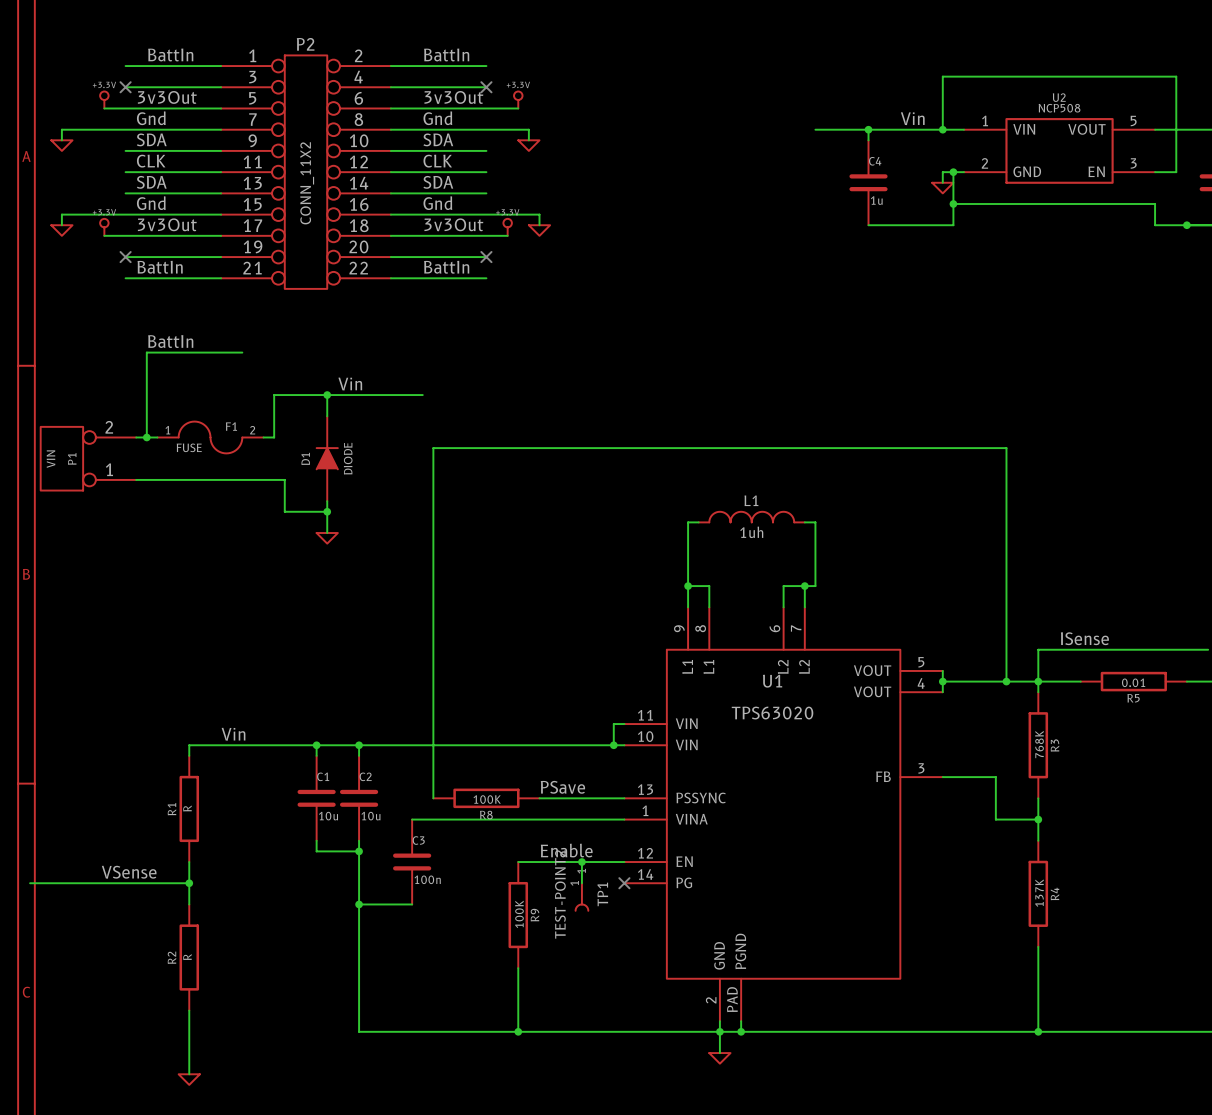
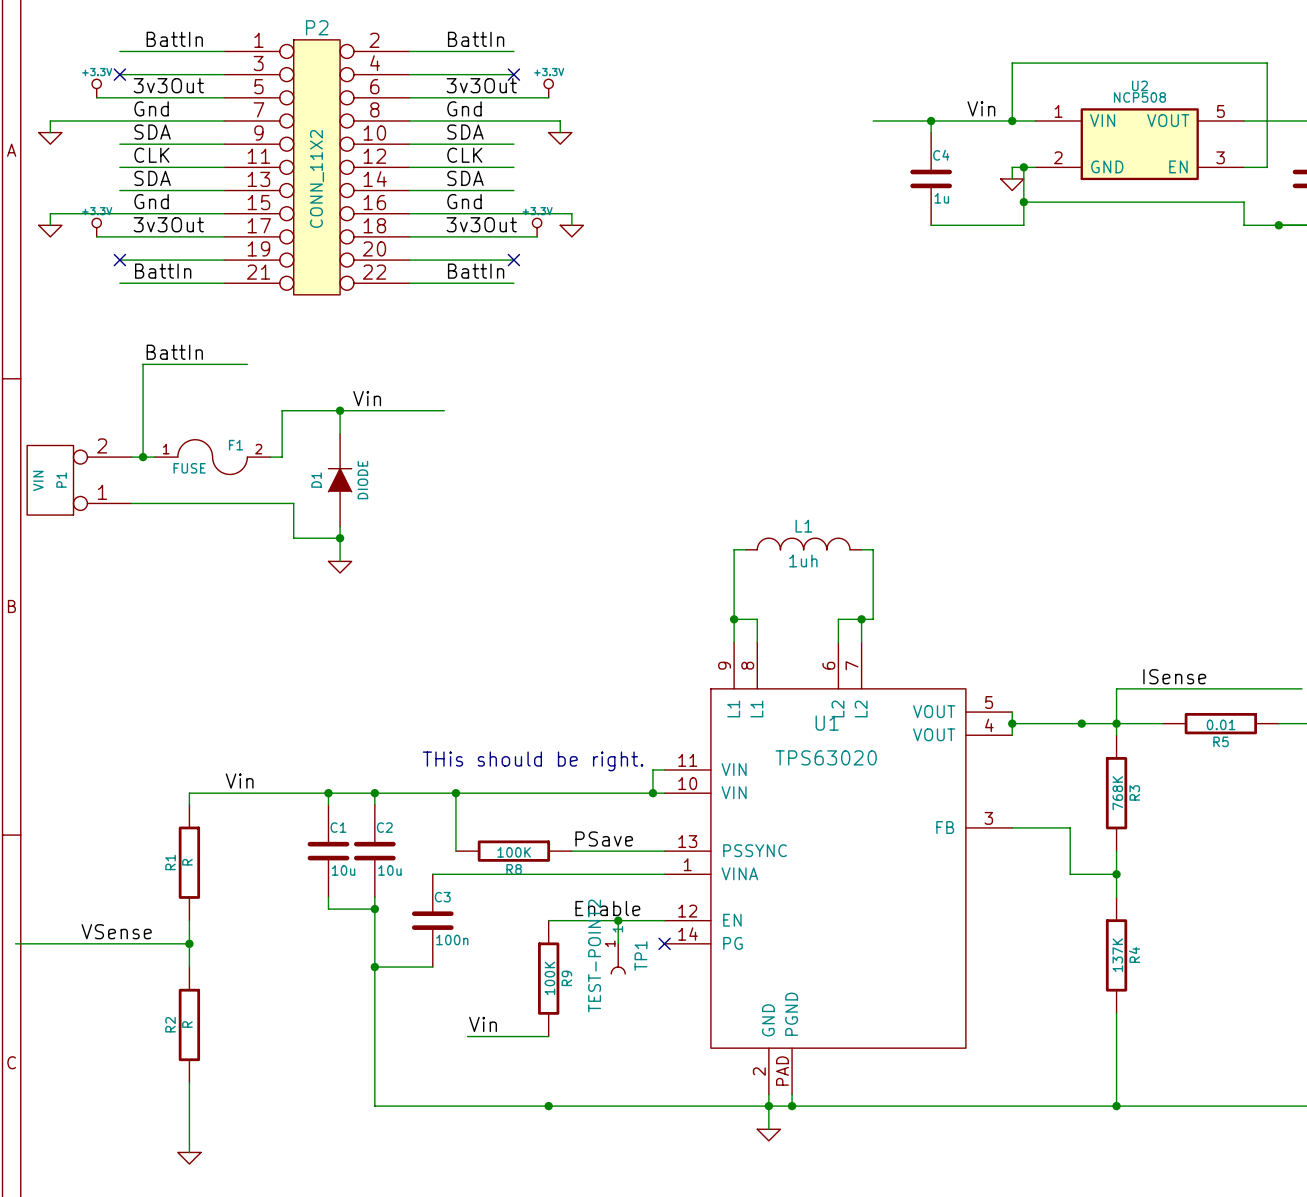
wire: (1006, 681) (1006, 448) (433, 448) (433, 745) -> none
text: none -> THis should be right. (533, 761)
junction: none -> (455, 793)
label: none -> Vin (483, 1024)
wire: (518, 968) (518, 1031) -> (548, 1036) (467, 1036)

